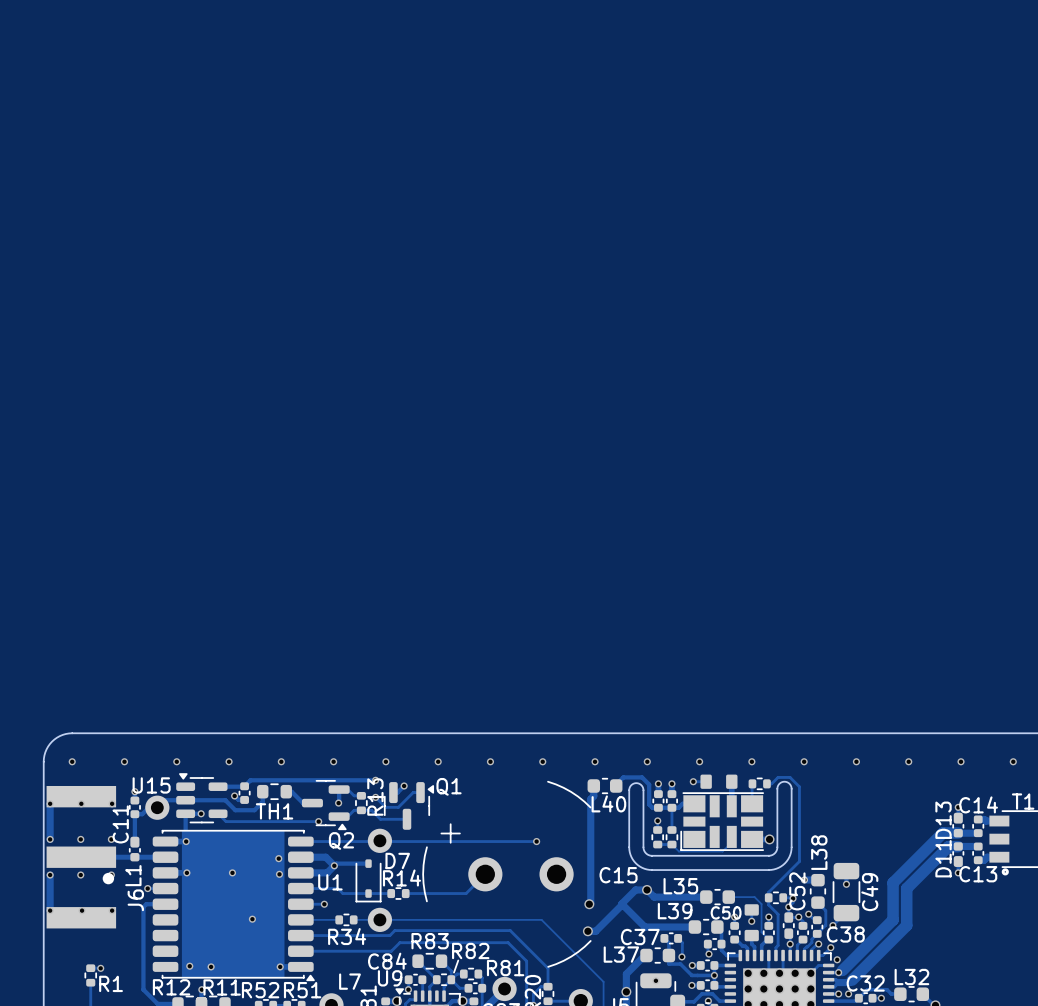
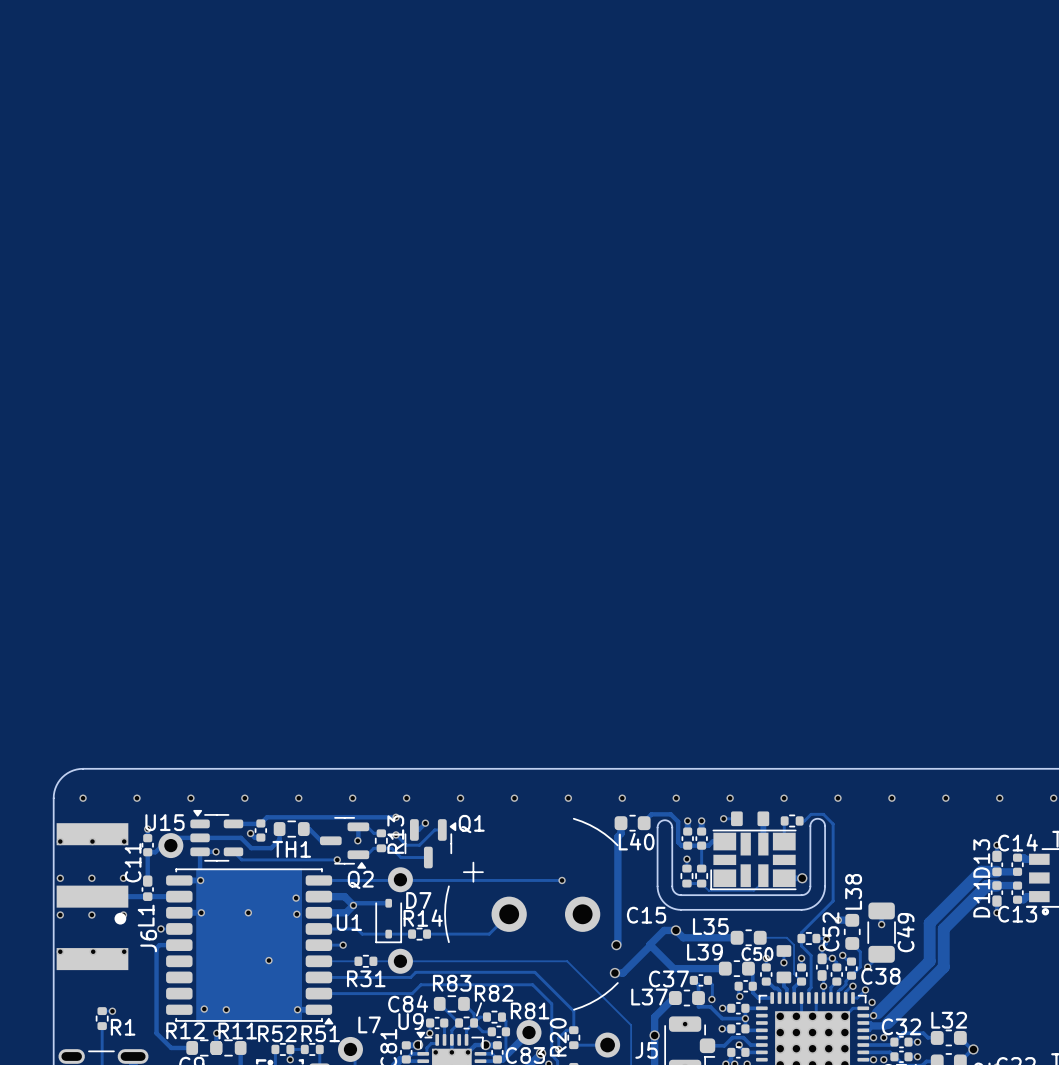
track: (50, 803) (50, 839) -> none
track: (50, 875) (50, 910) -> none
R34 name: R34 (347, 936) -> R31 (366, 978)

